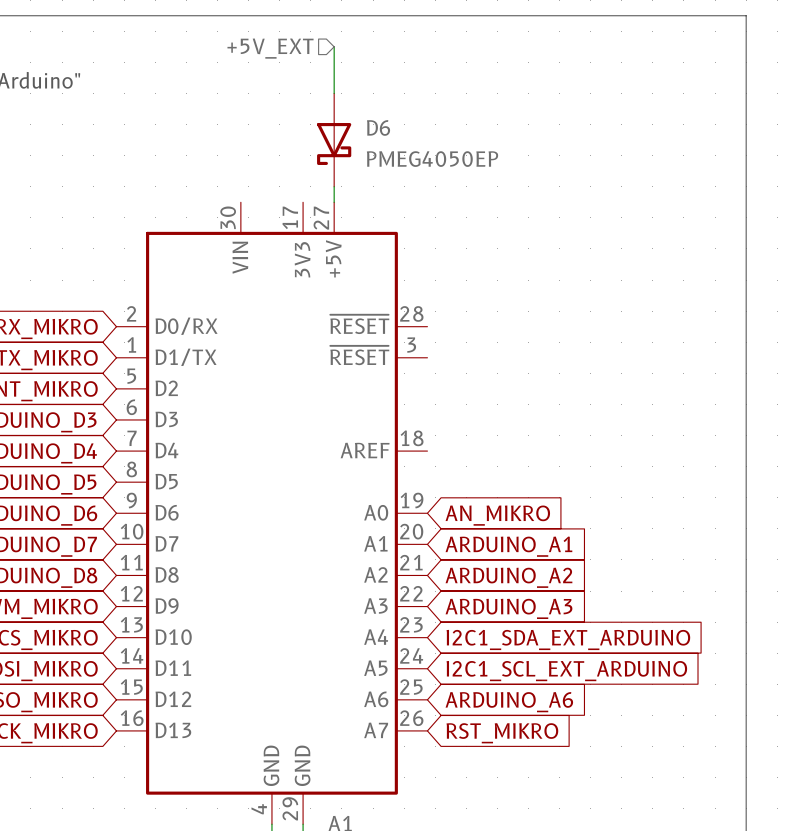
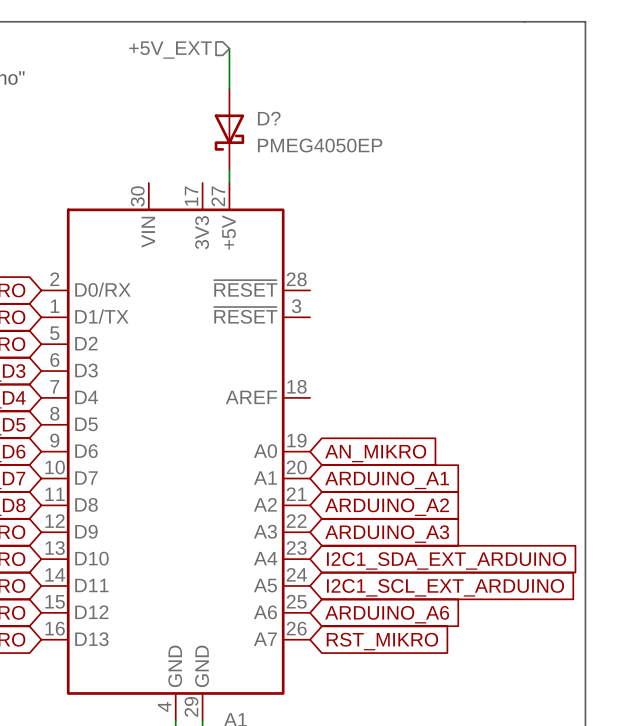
D6 name: D6 (378, 127) -> D? (269, 118)

